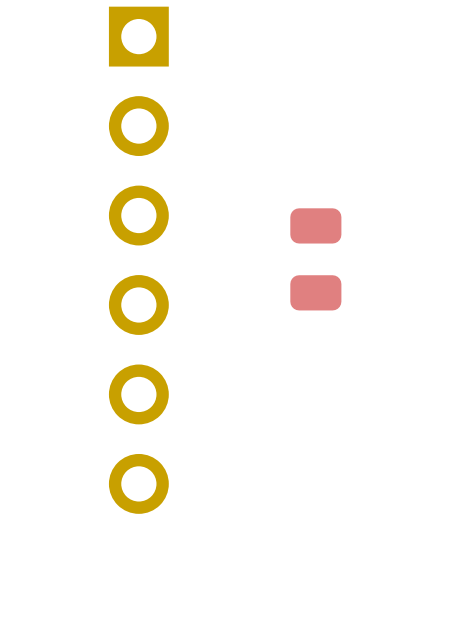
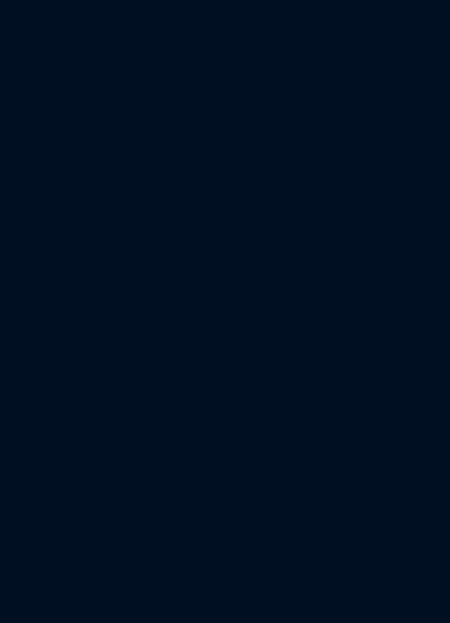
part: (315, 259) -> none
part: (138, 260) -> none

